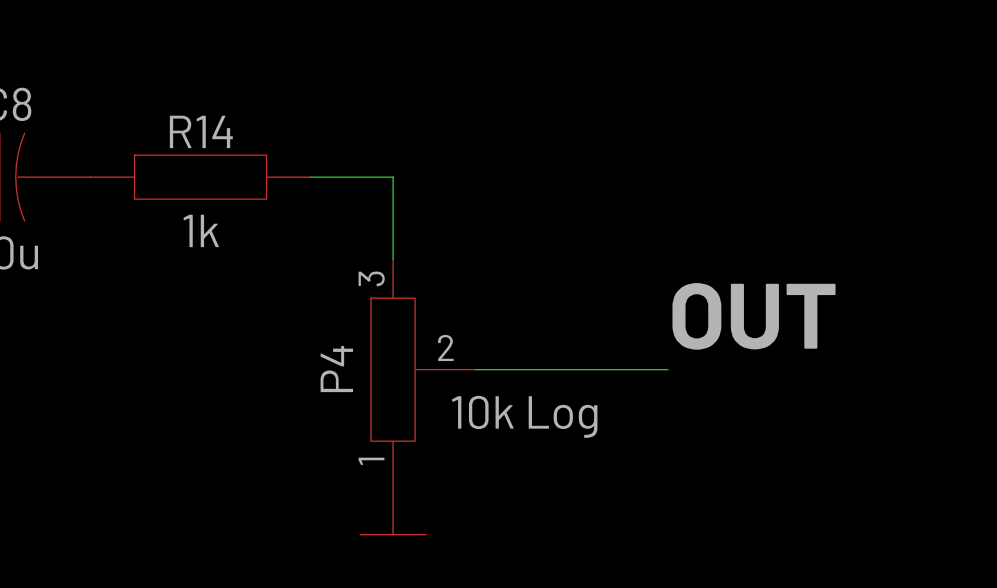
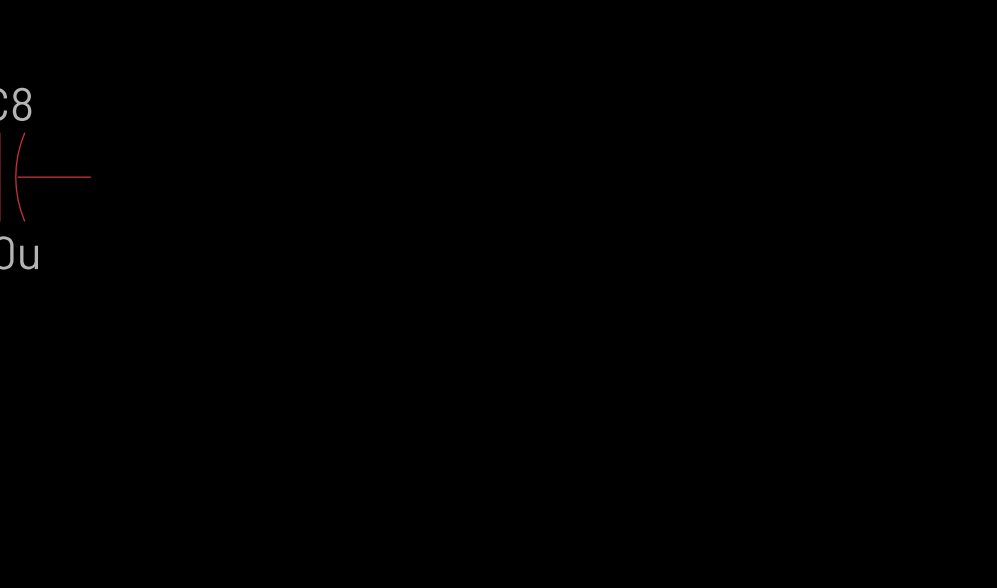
R14: 1k (200, 177) -> none
wire: (310, 177) (393, 177) (393, 259) -> none
label: OUT (754, 316) -> none
P4: 10k Log (423, 369) -> none
wire: (475, 369) (668, 369) -> none
power symbol: (393, 507) -> none

